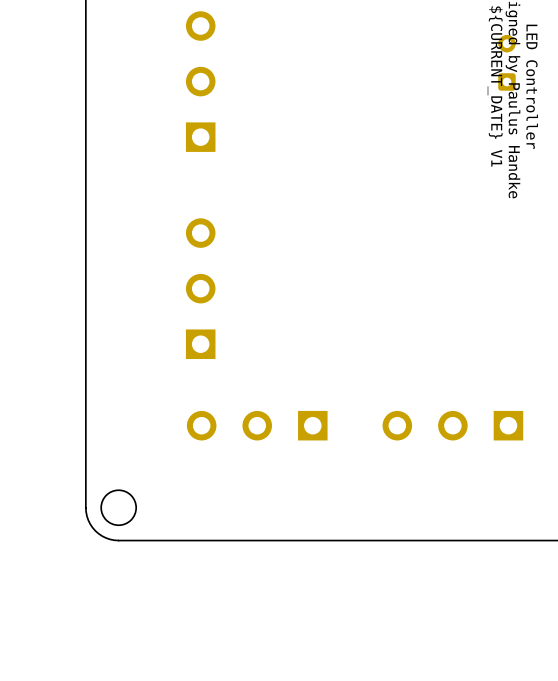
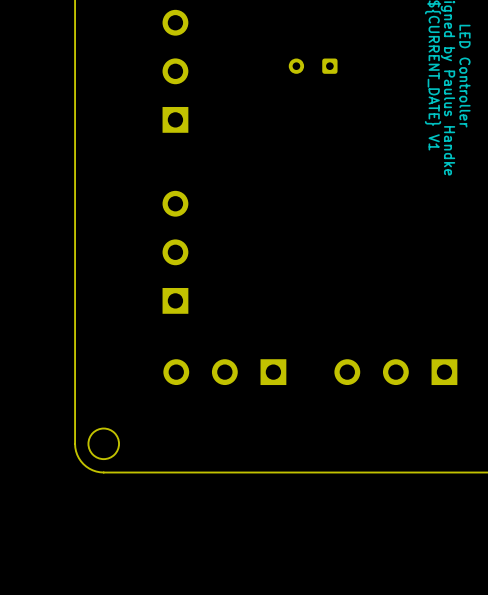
part rotation: 0° (506, 62) -> 90° counterclockwise (313, 66)
part position: (506, 62) -> (313, 66)

